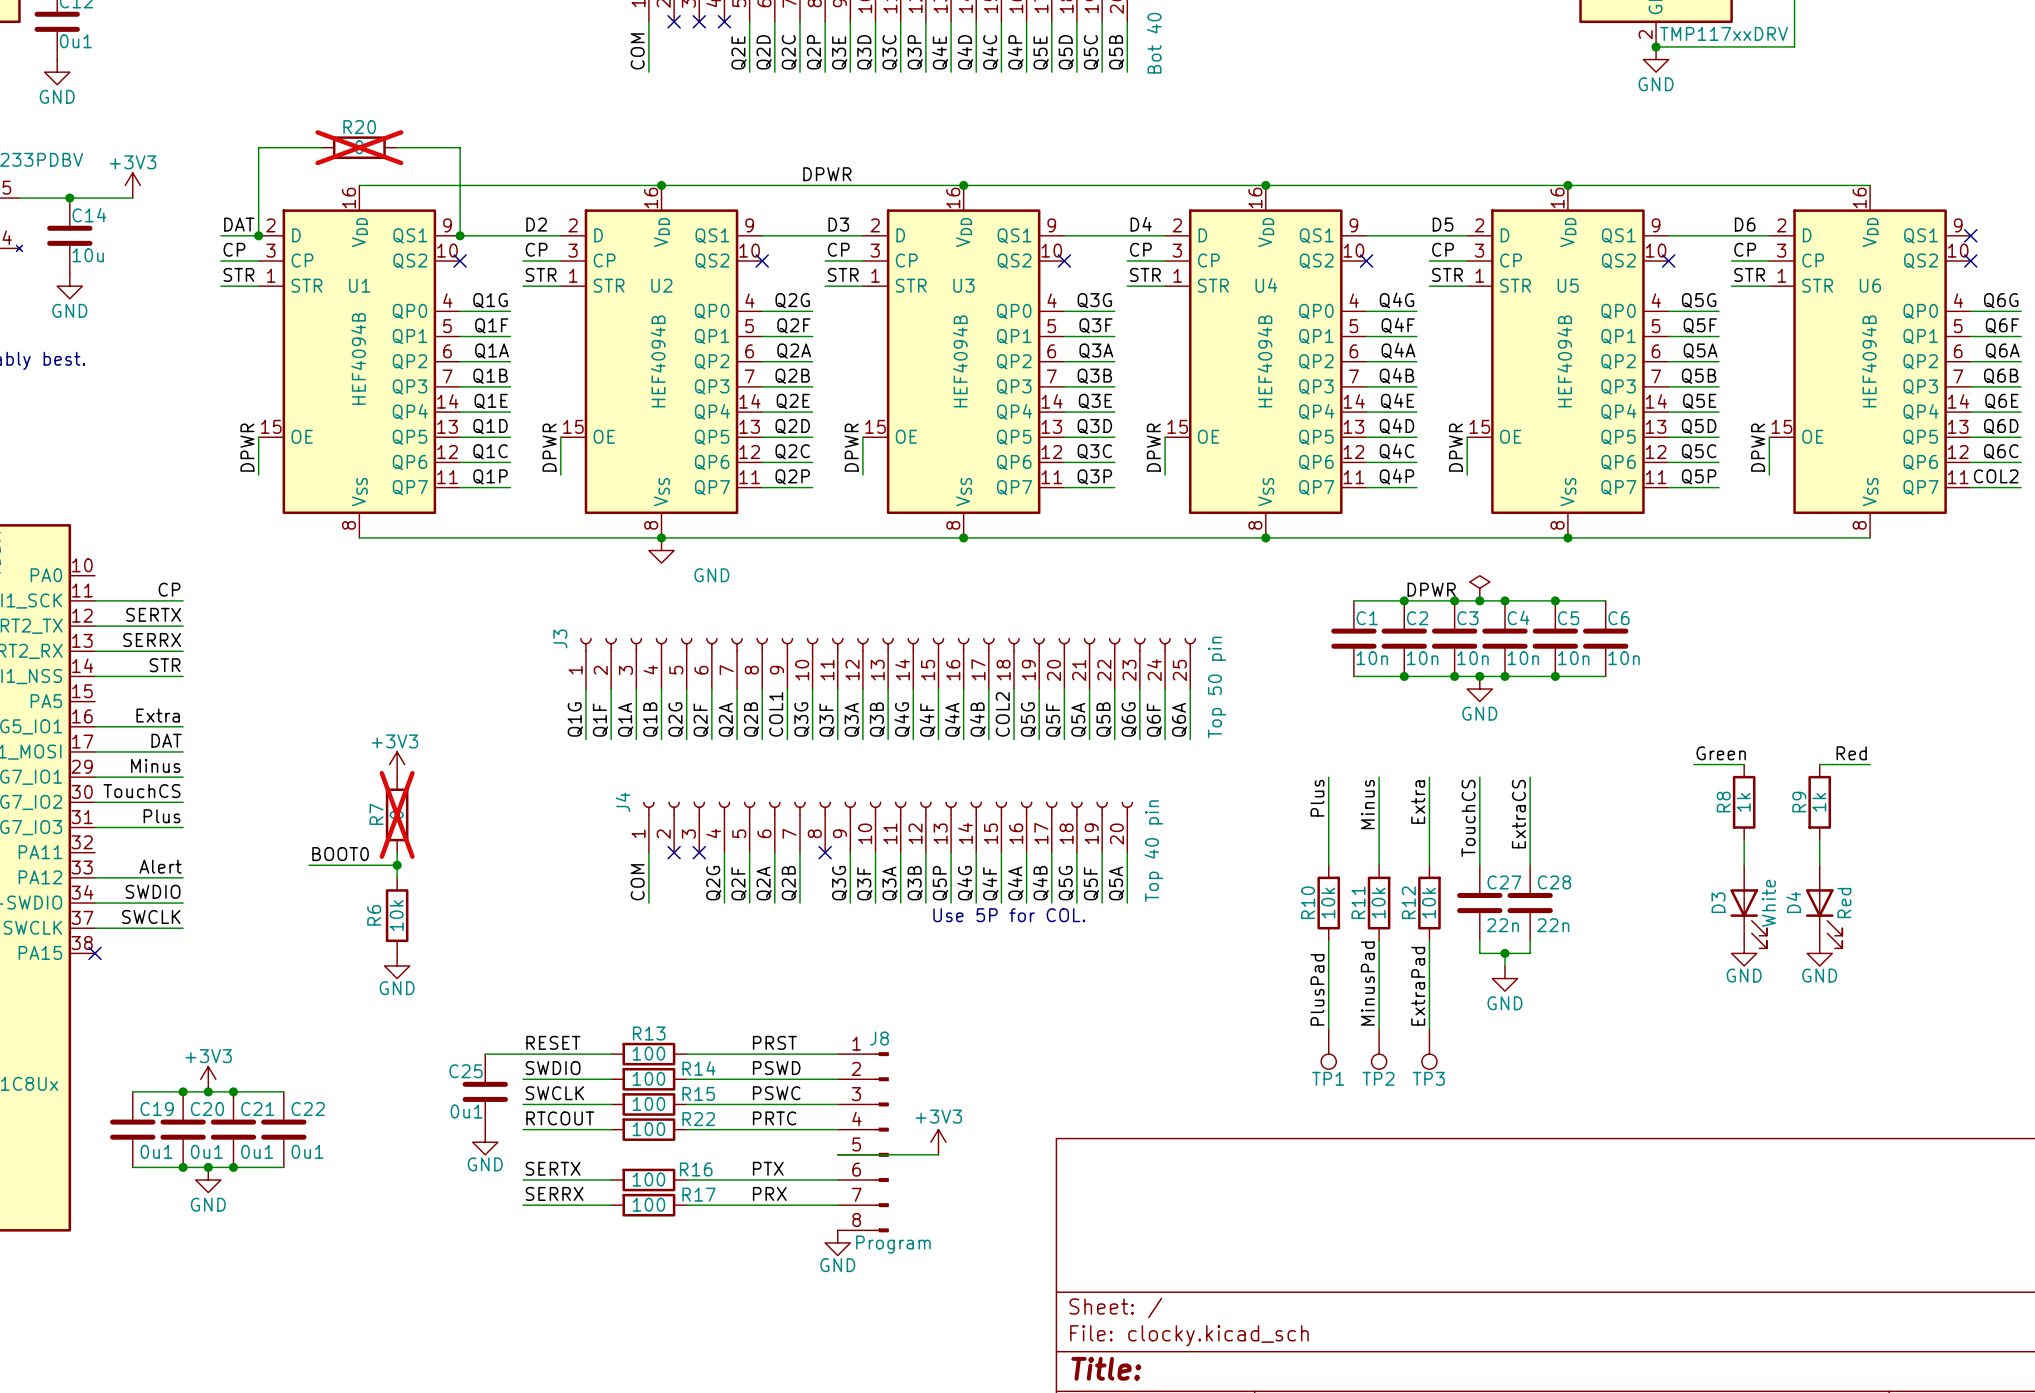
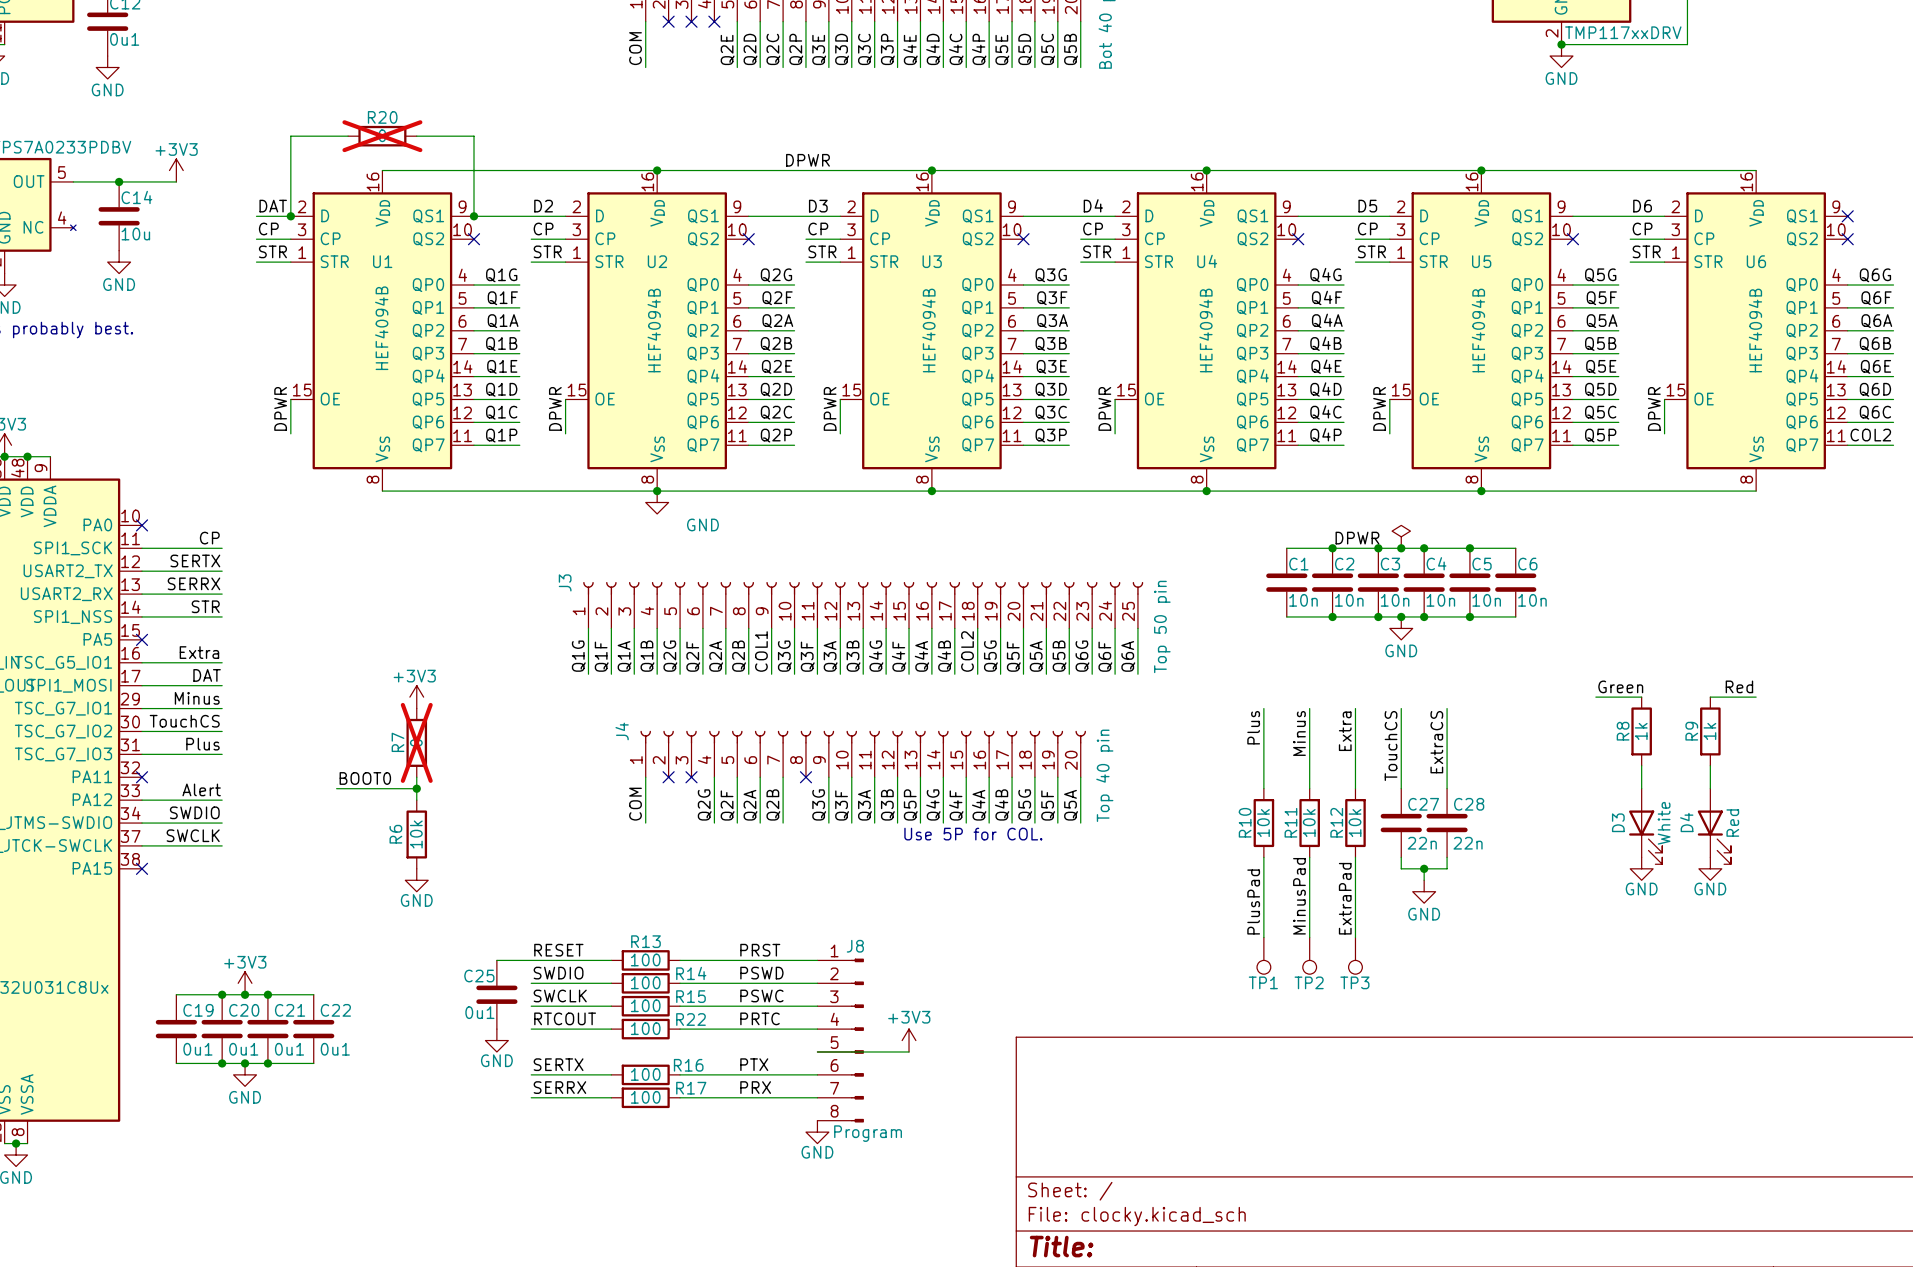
no-connect mark: none -> (142, 525)
no-connect mark: none -> (142, 639)
no-connect mark: none -> (142, 777)

